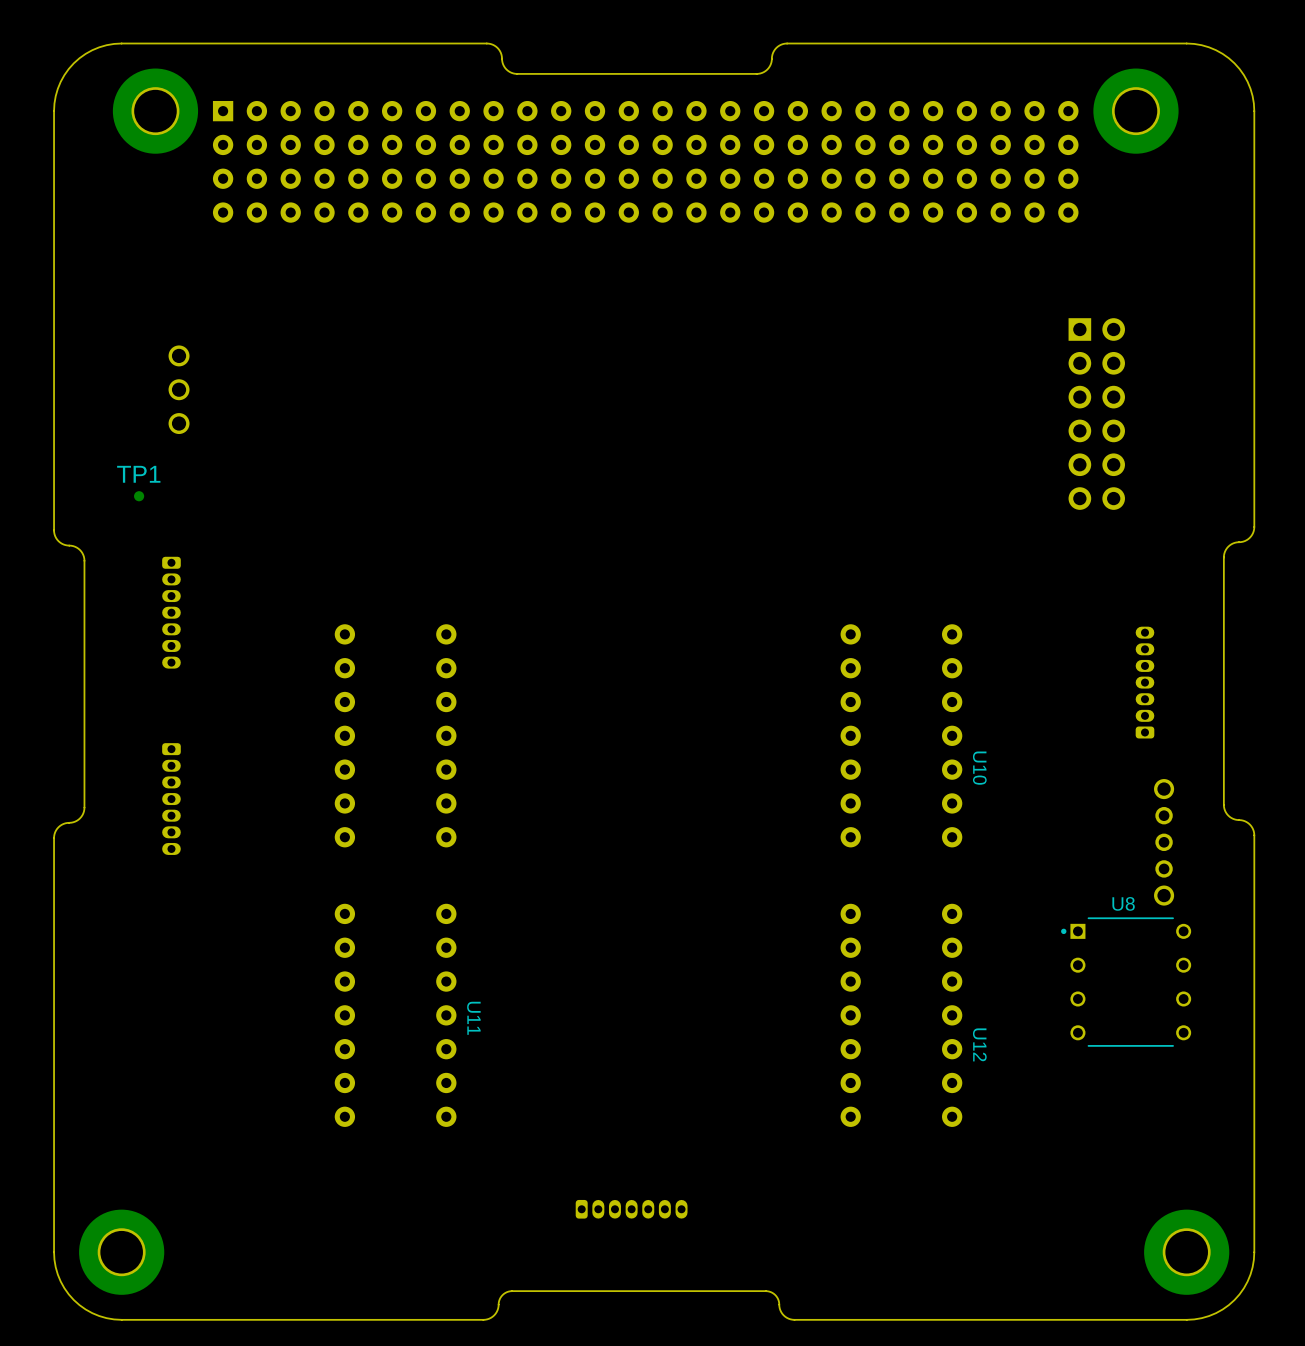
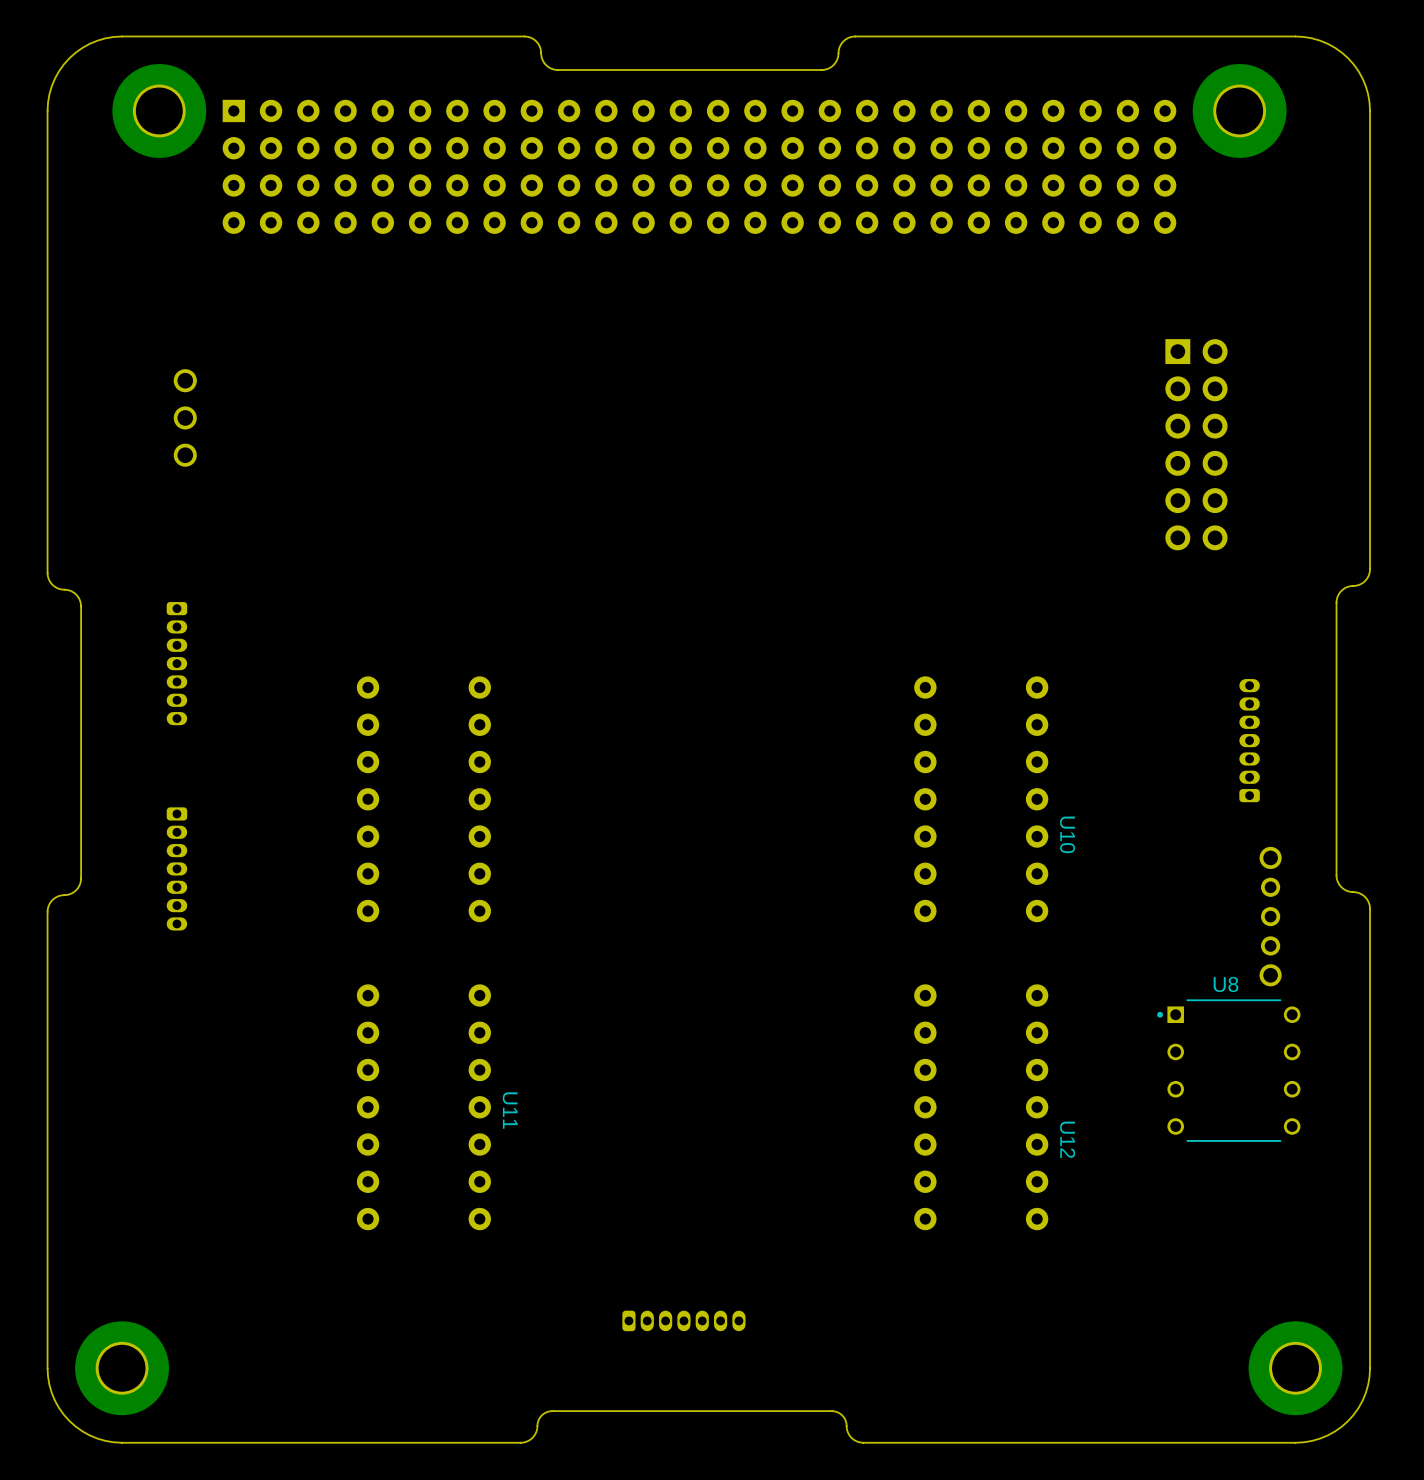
TP1: (139, 496) -> none

